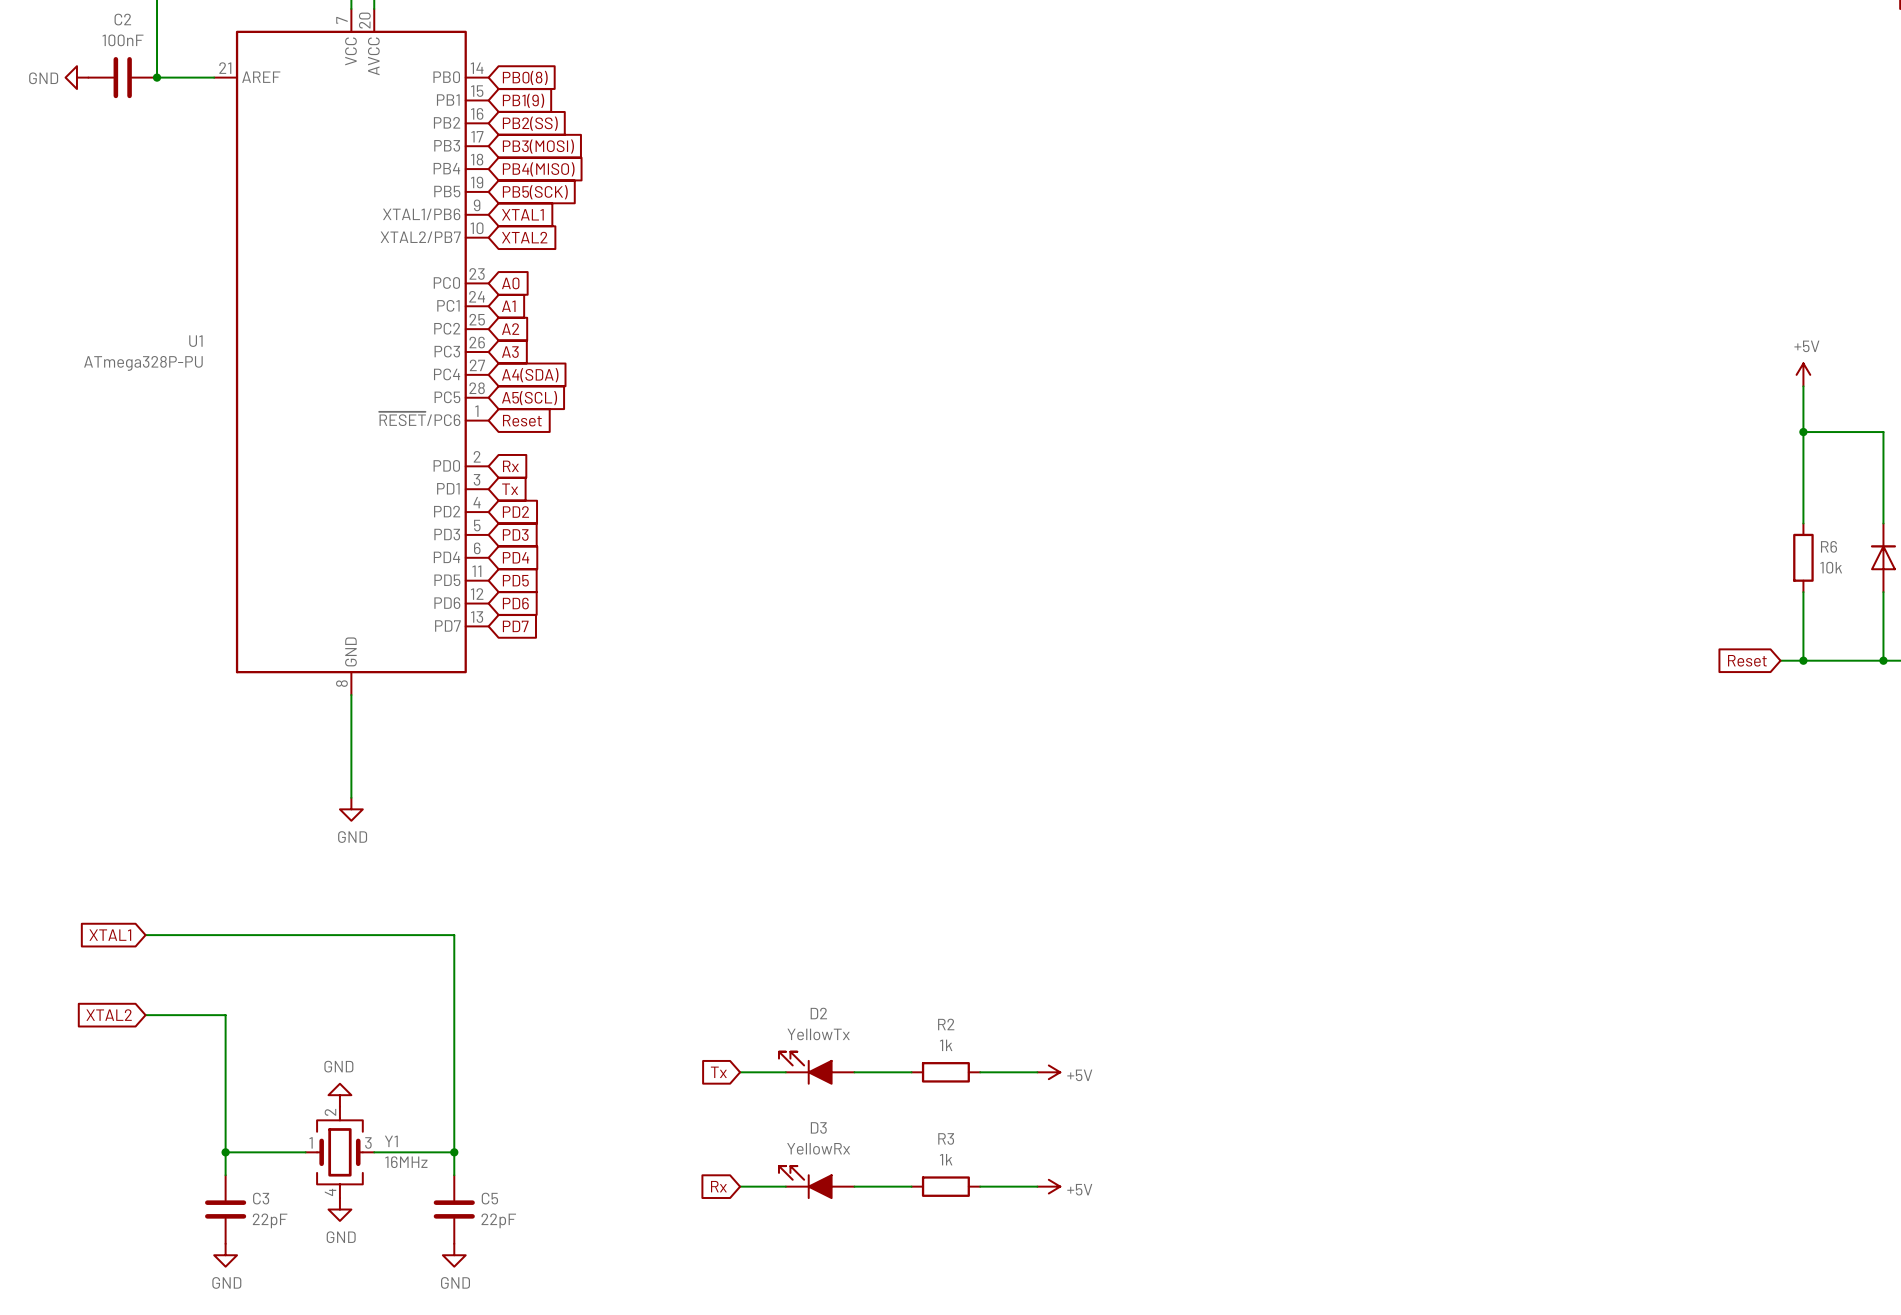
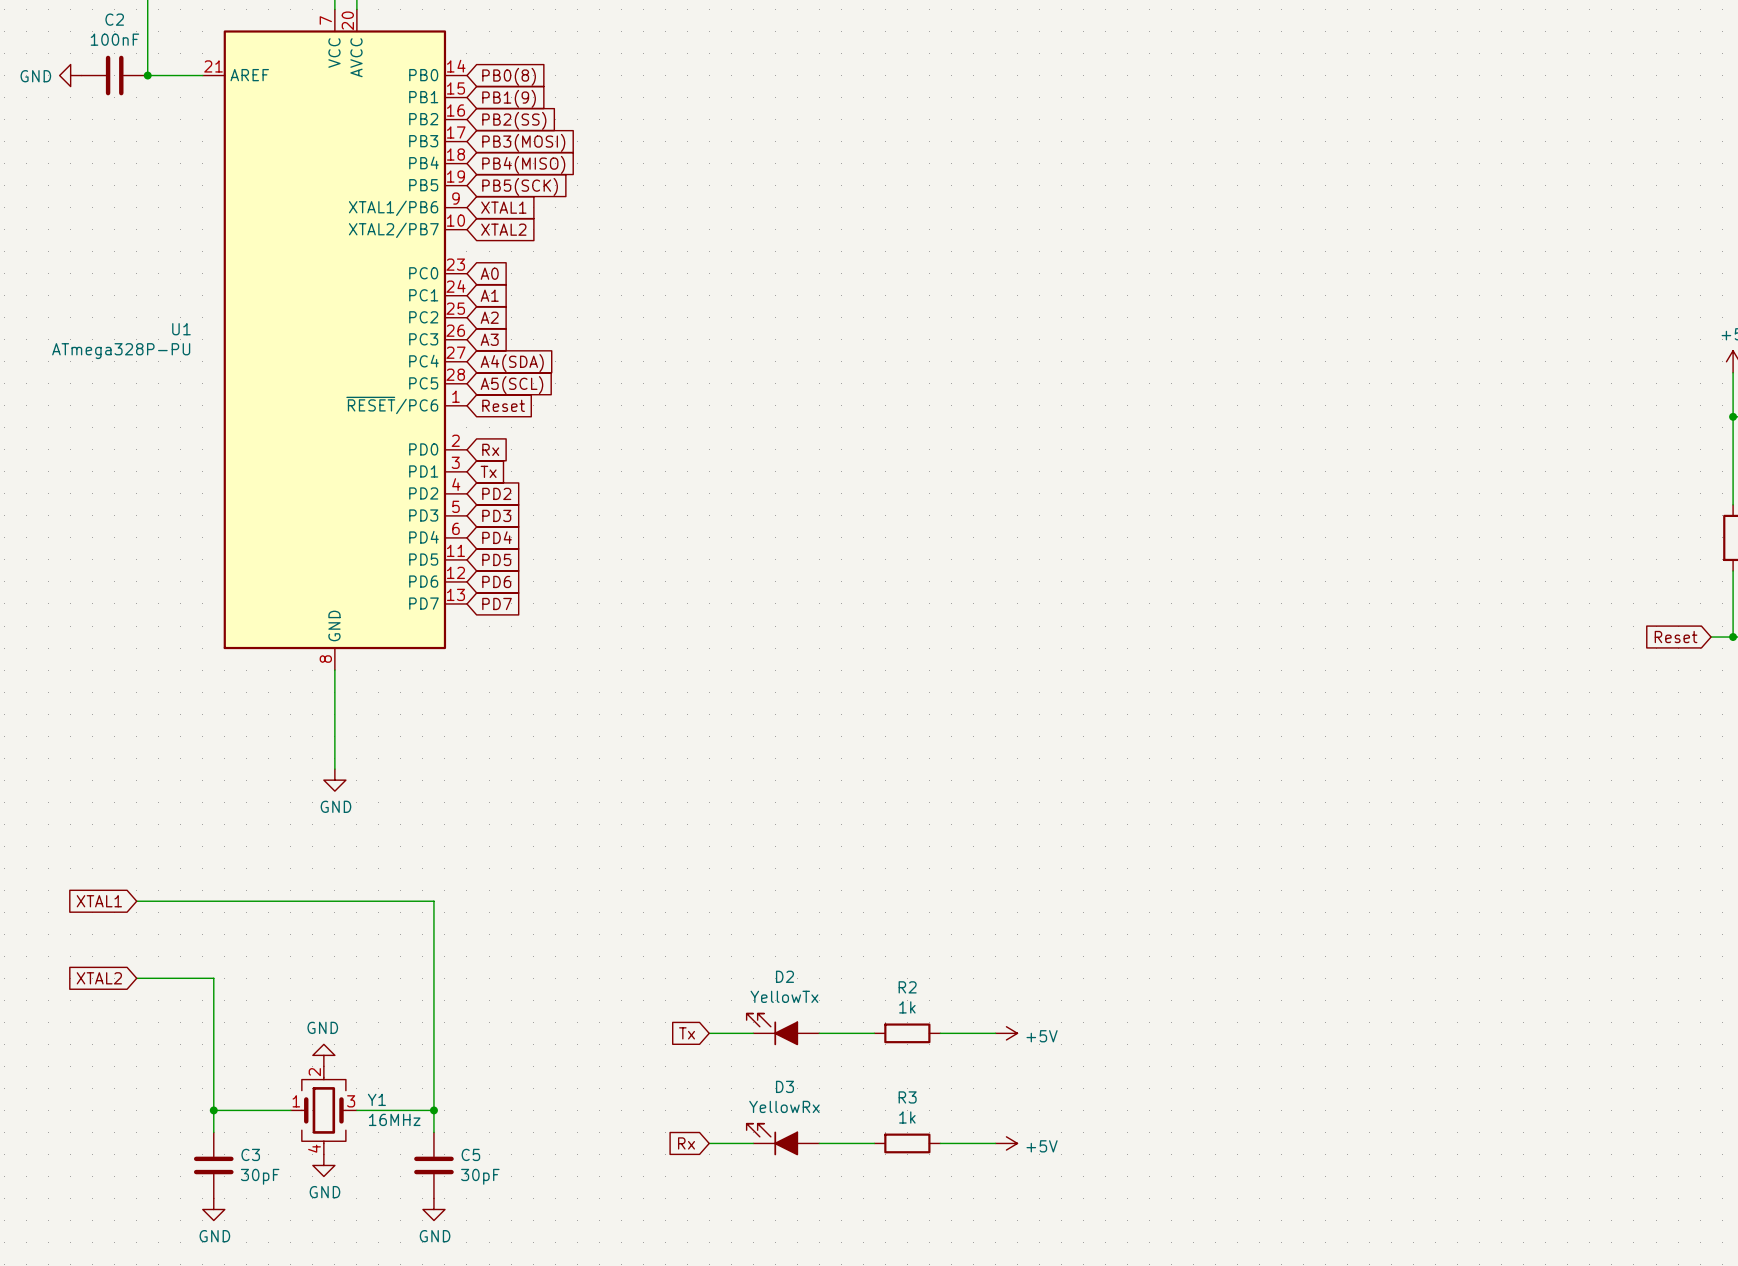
C3 value: 22pF (270, 1220) -> 30pF (260, 1176)
C5 value: 22pF (498, 1220) -> 30pF (480, 1176)

